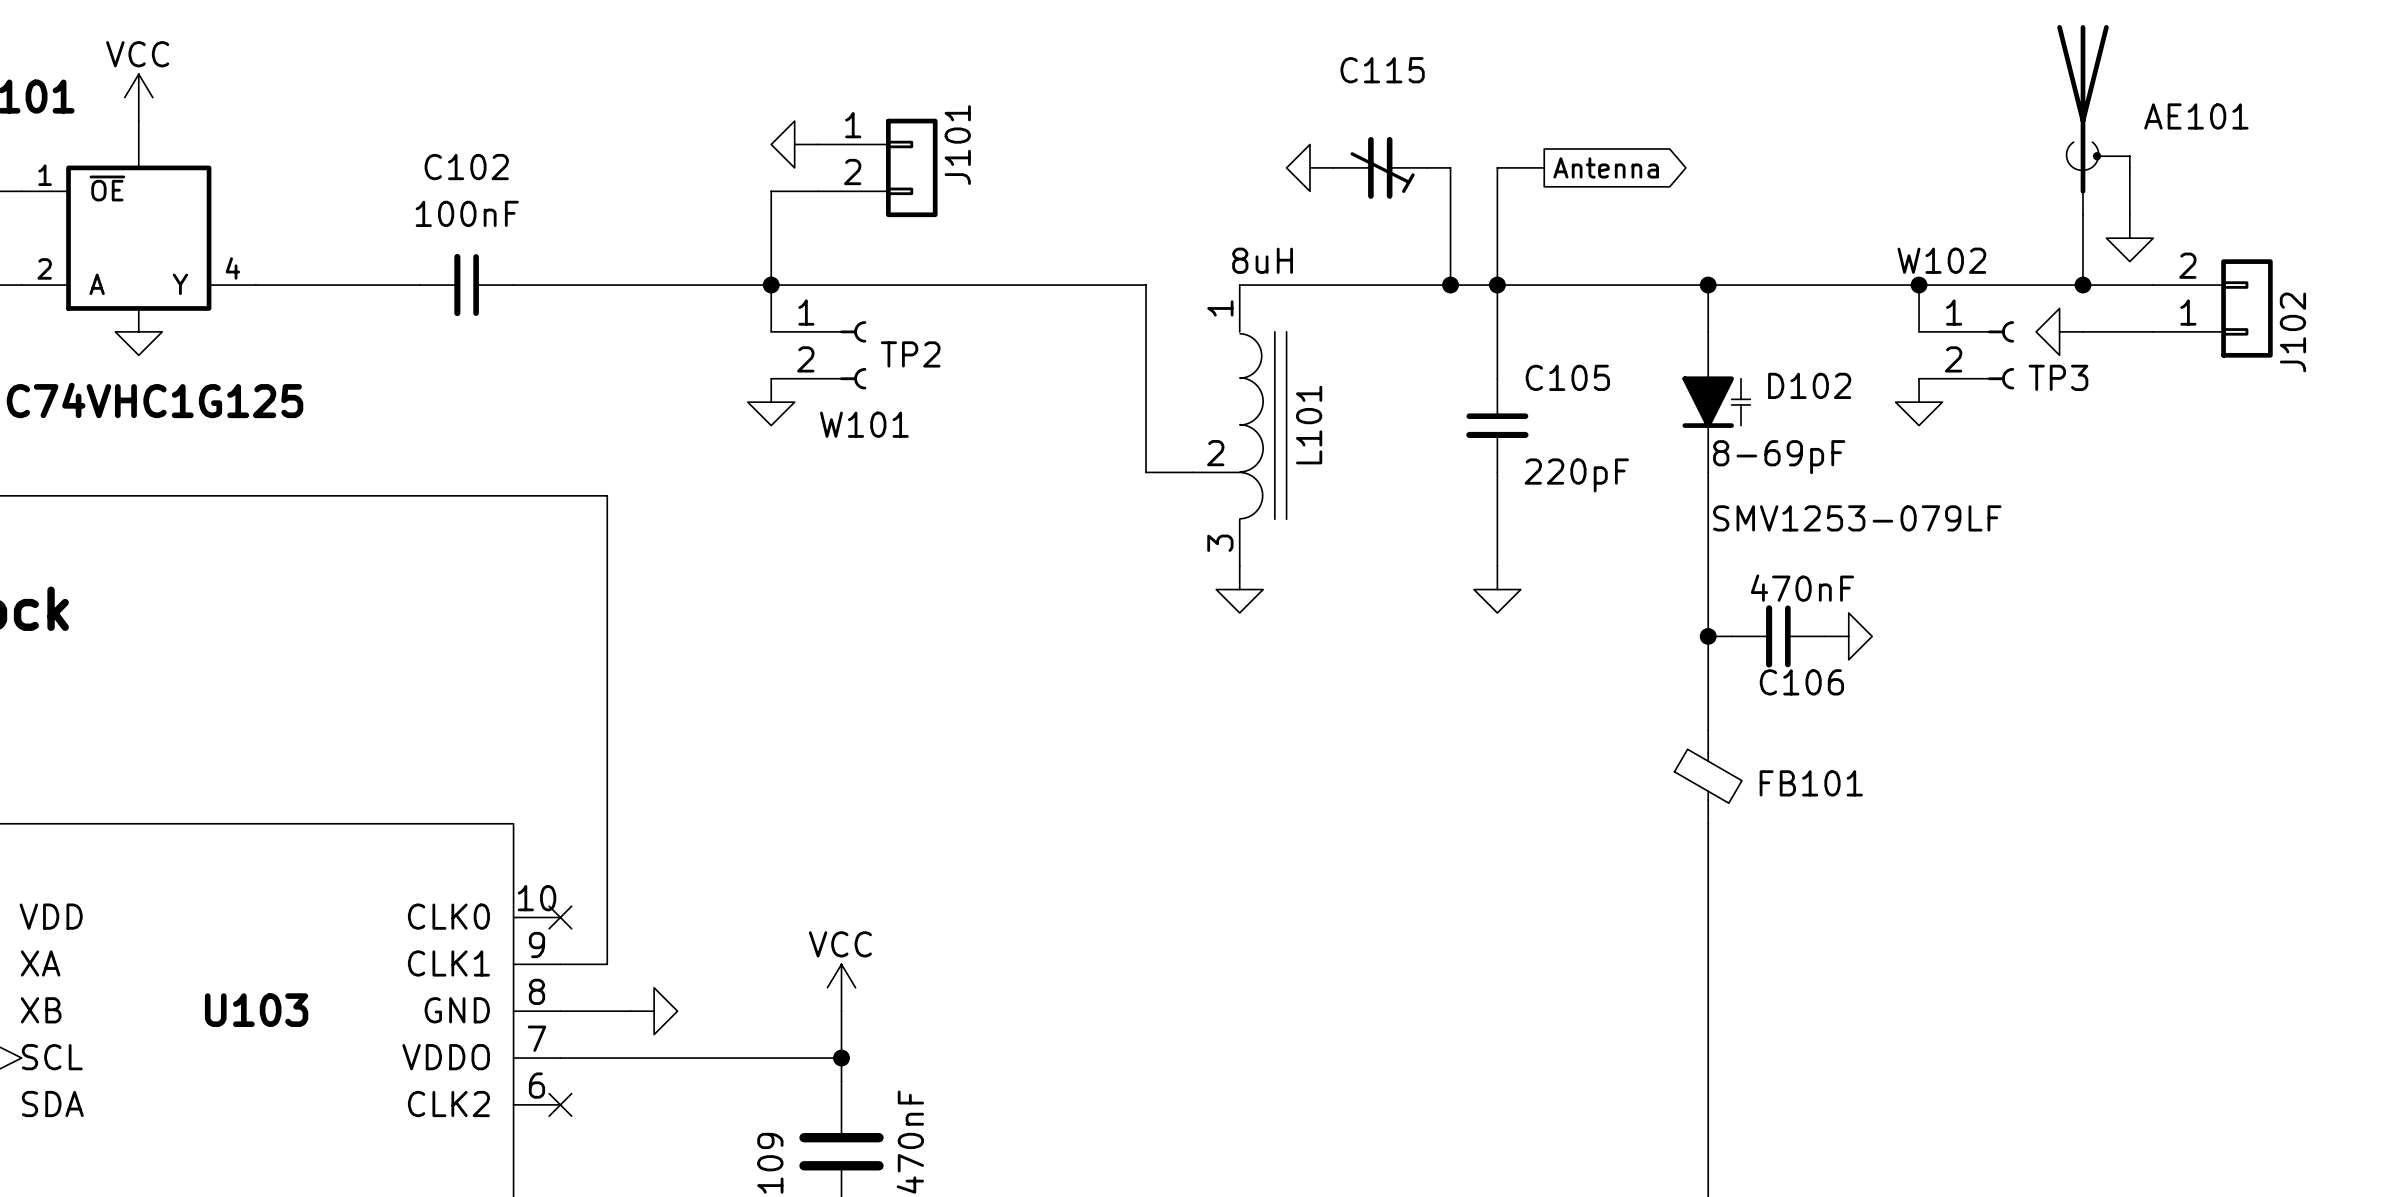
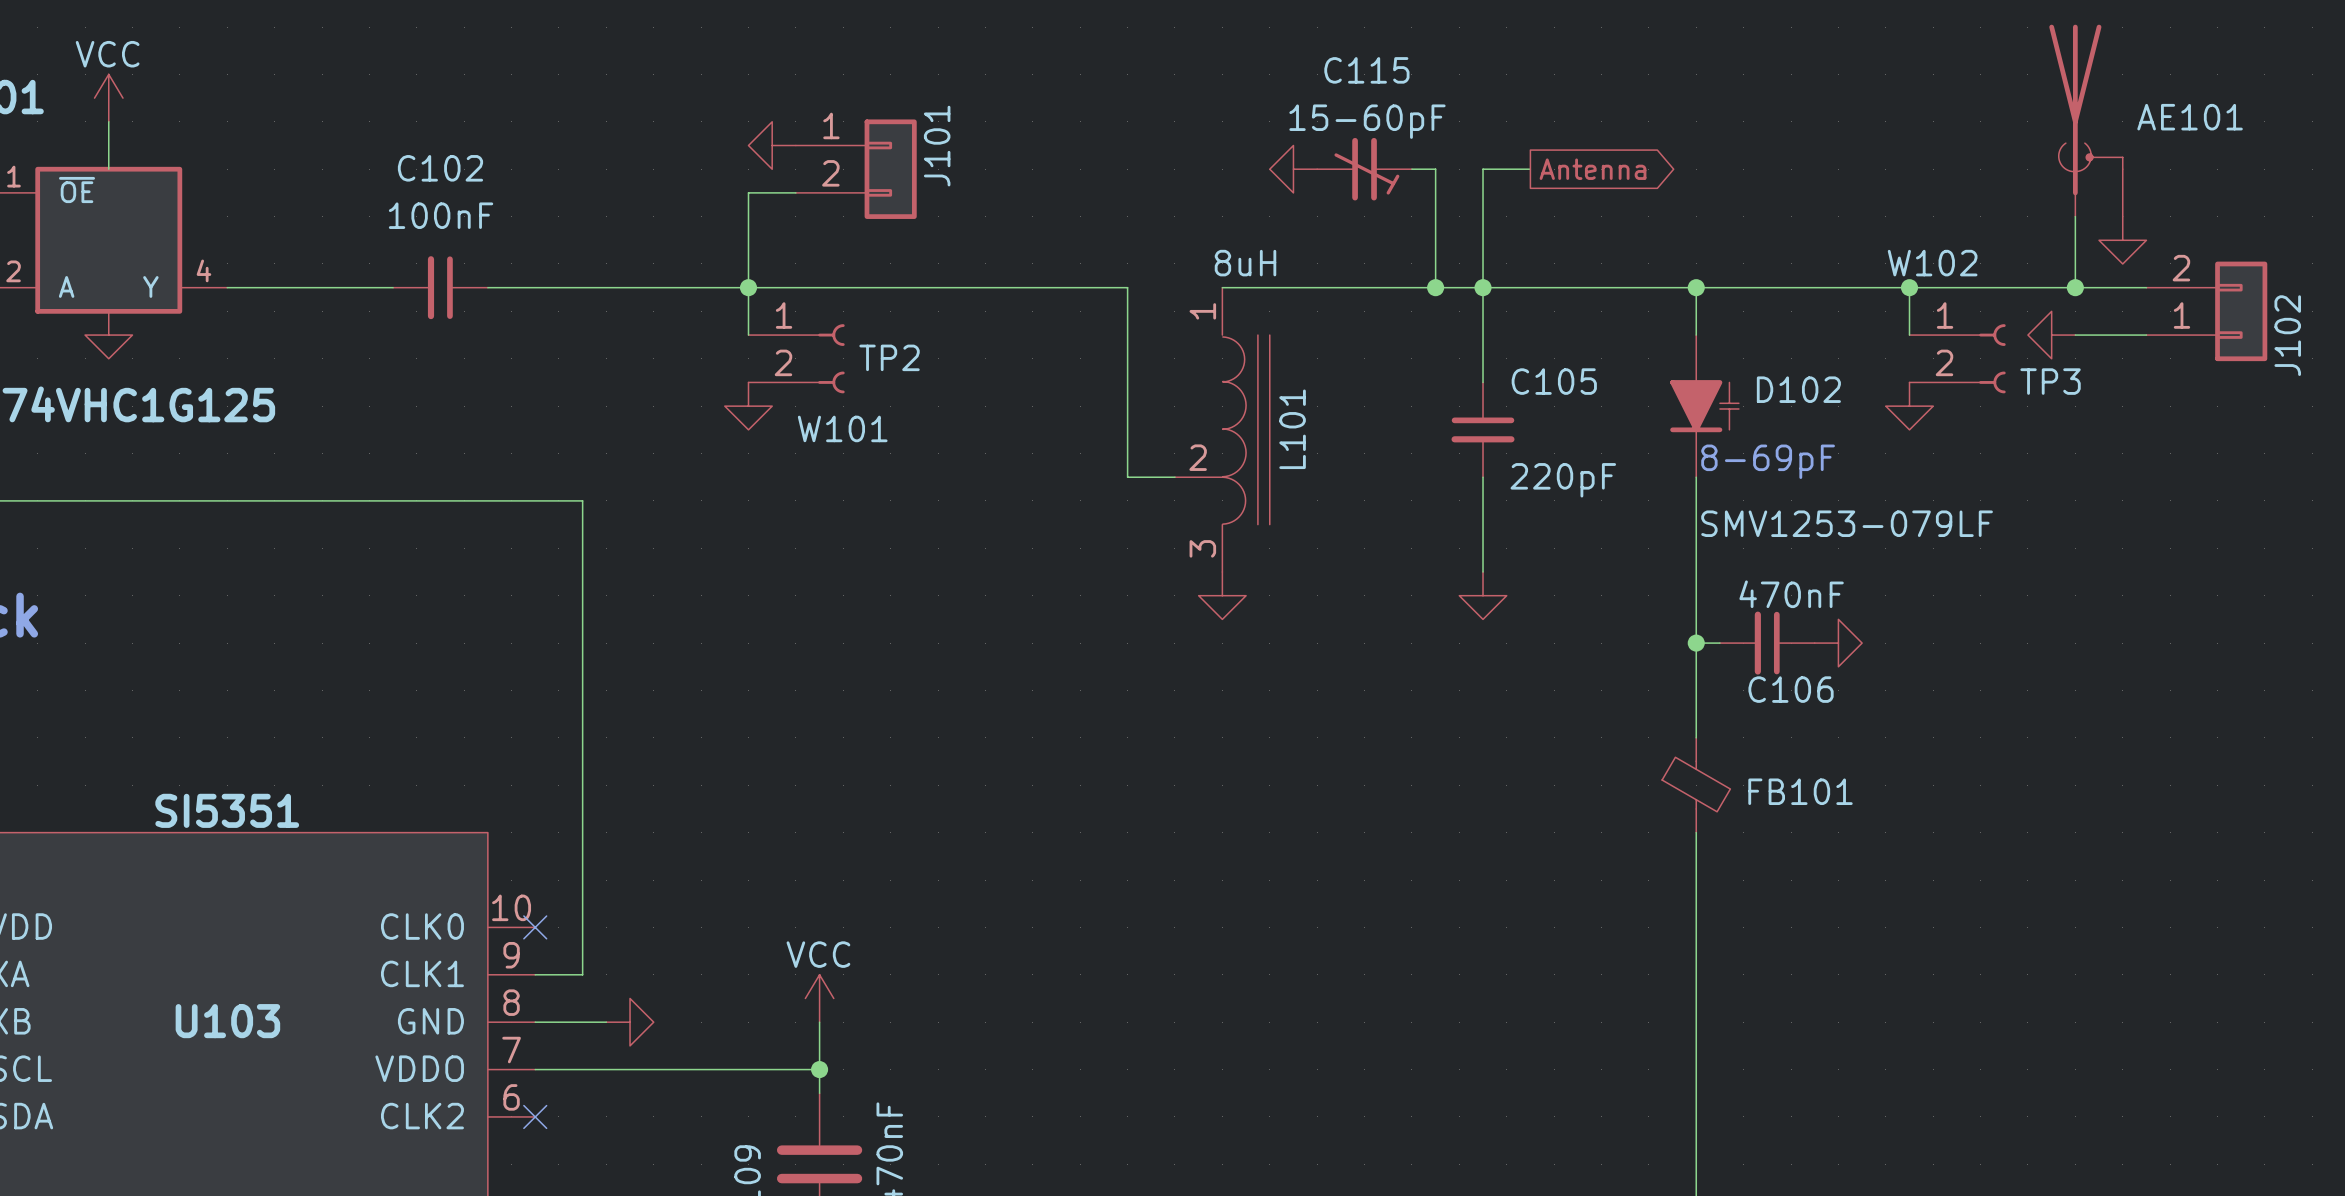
C115 value: none -> 15-60pF (1367, 121)
U103 value: none -> SI5351 (227, 810)

